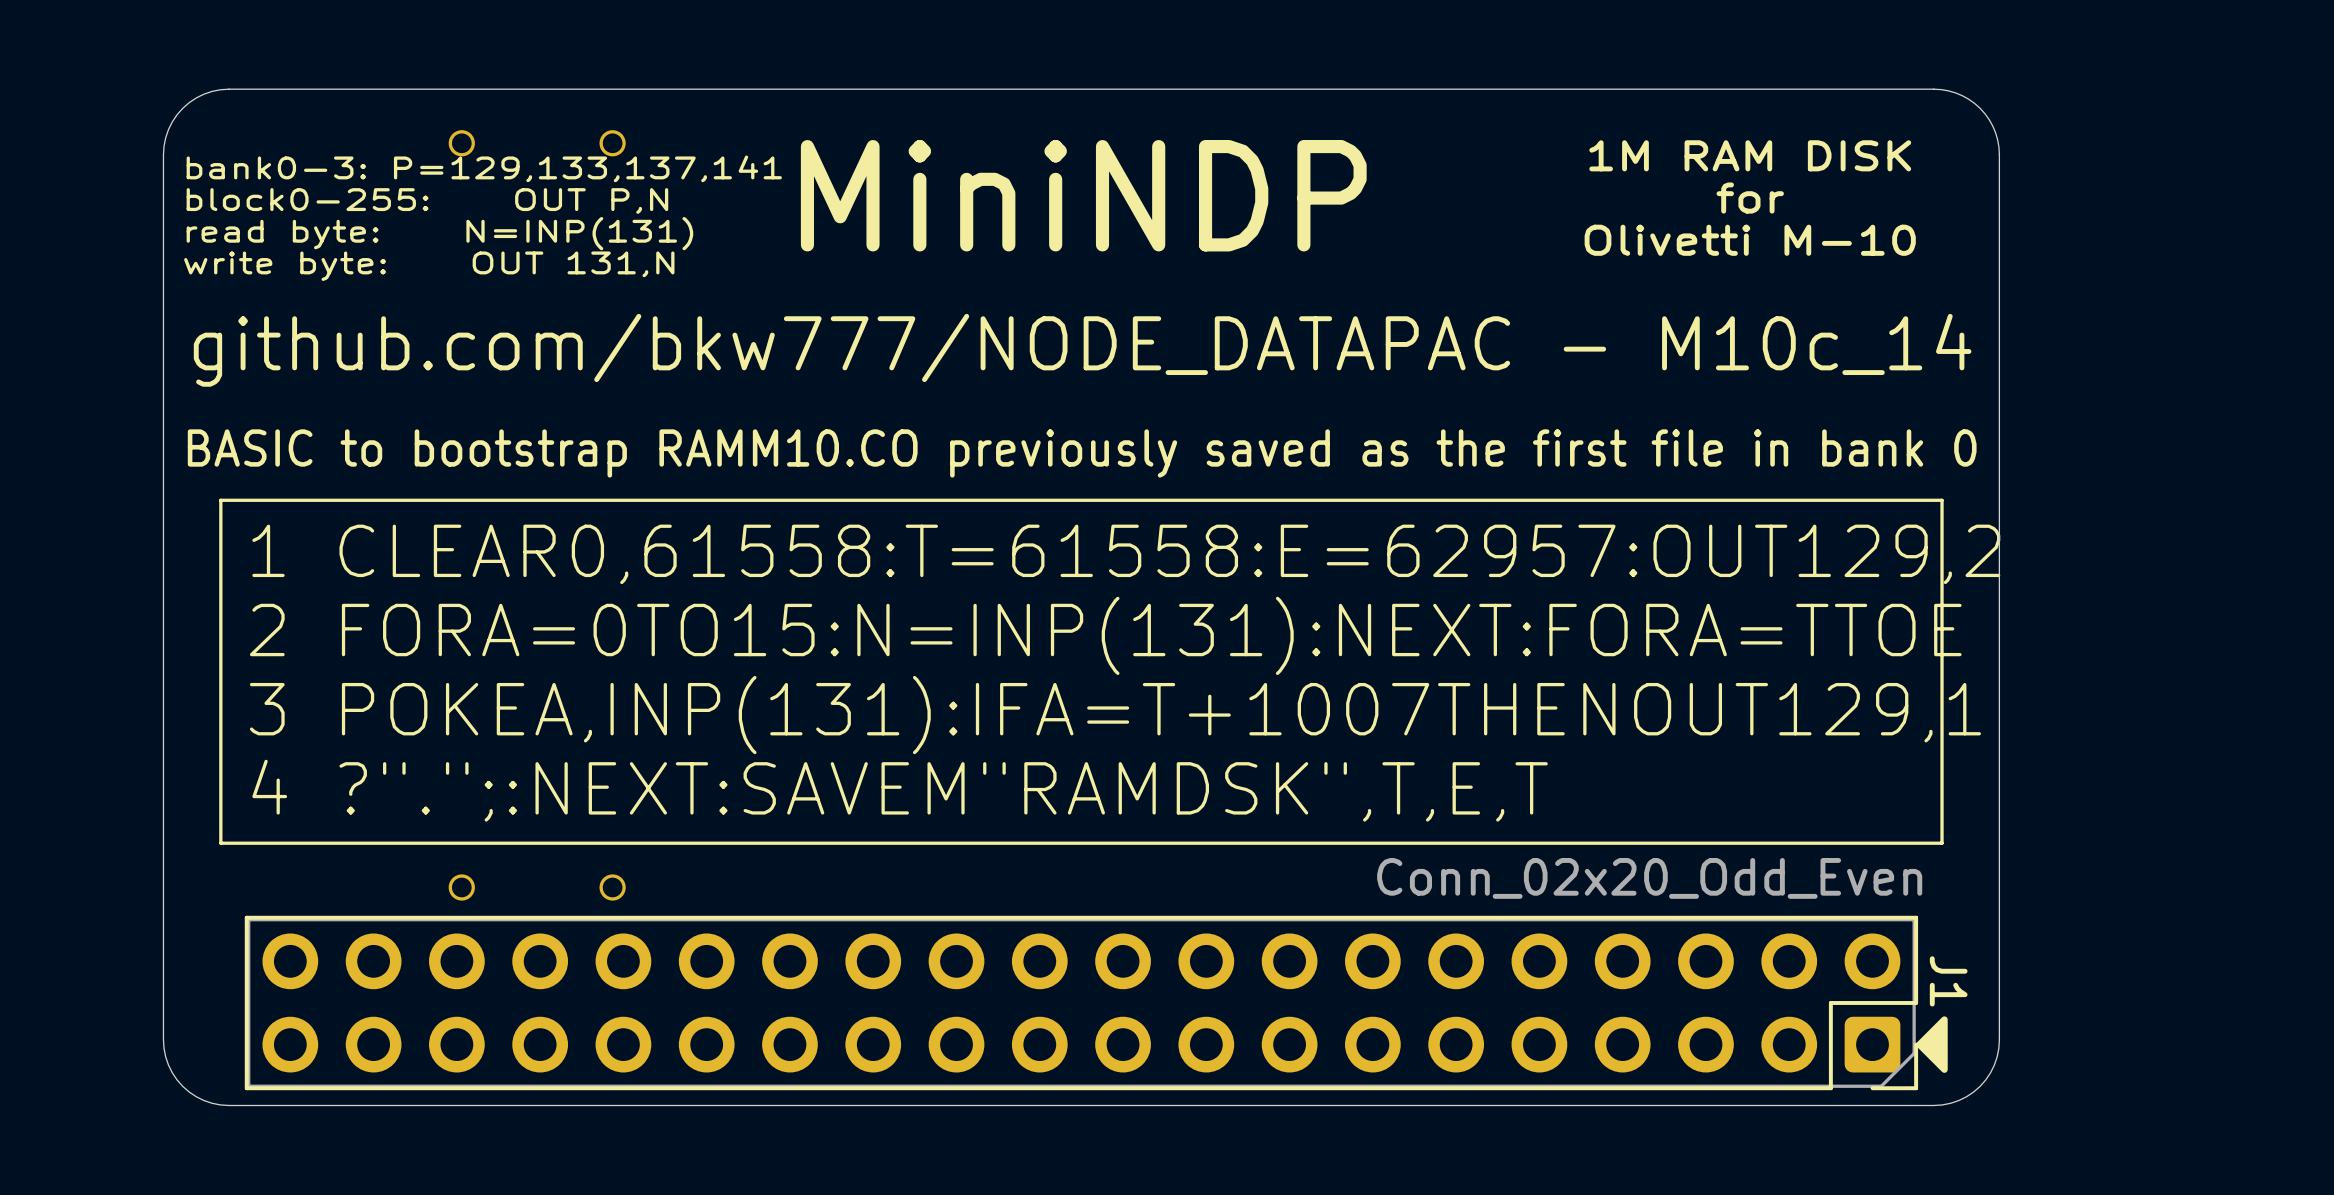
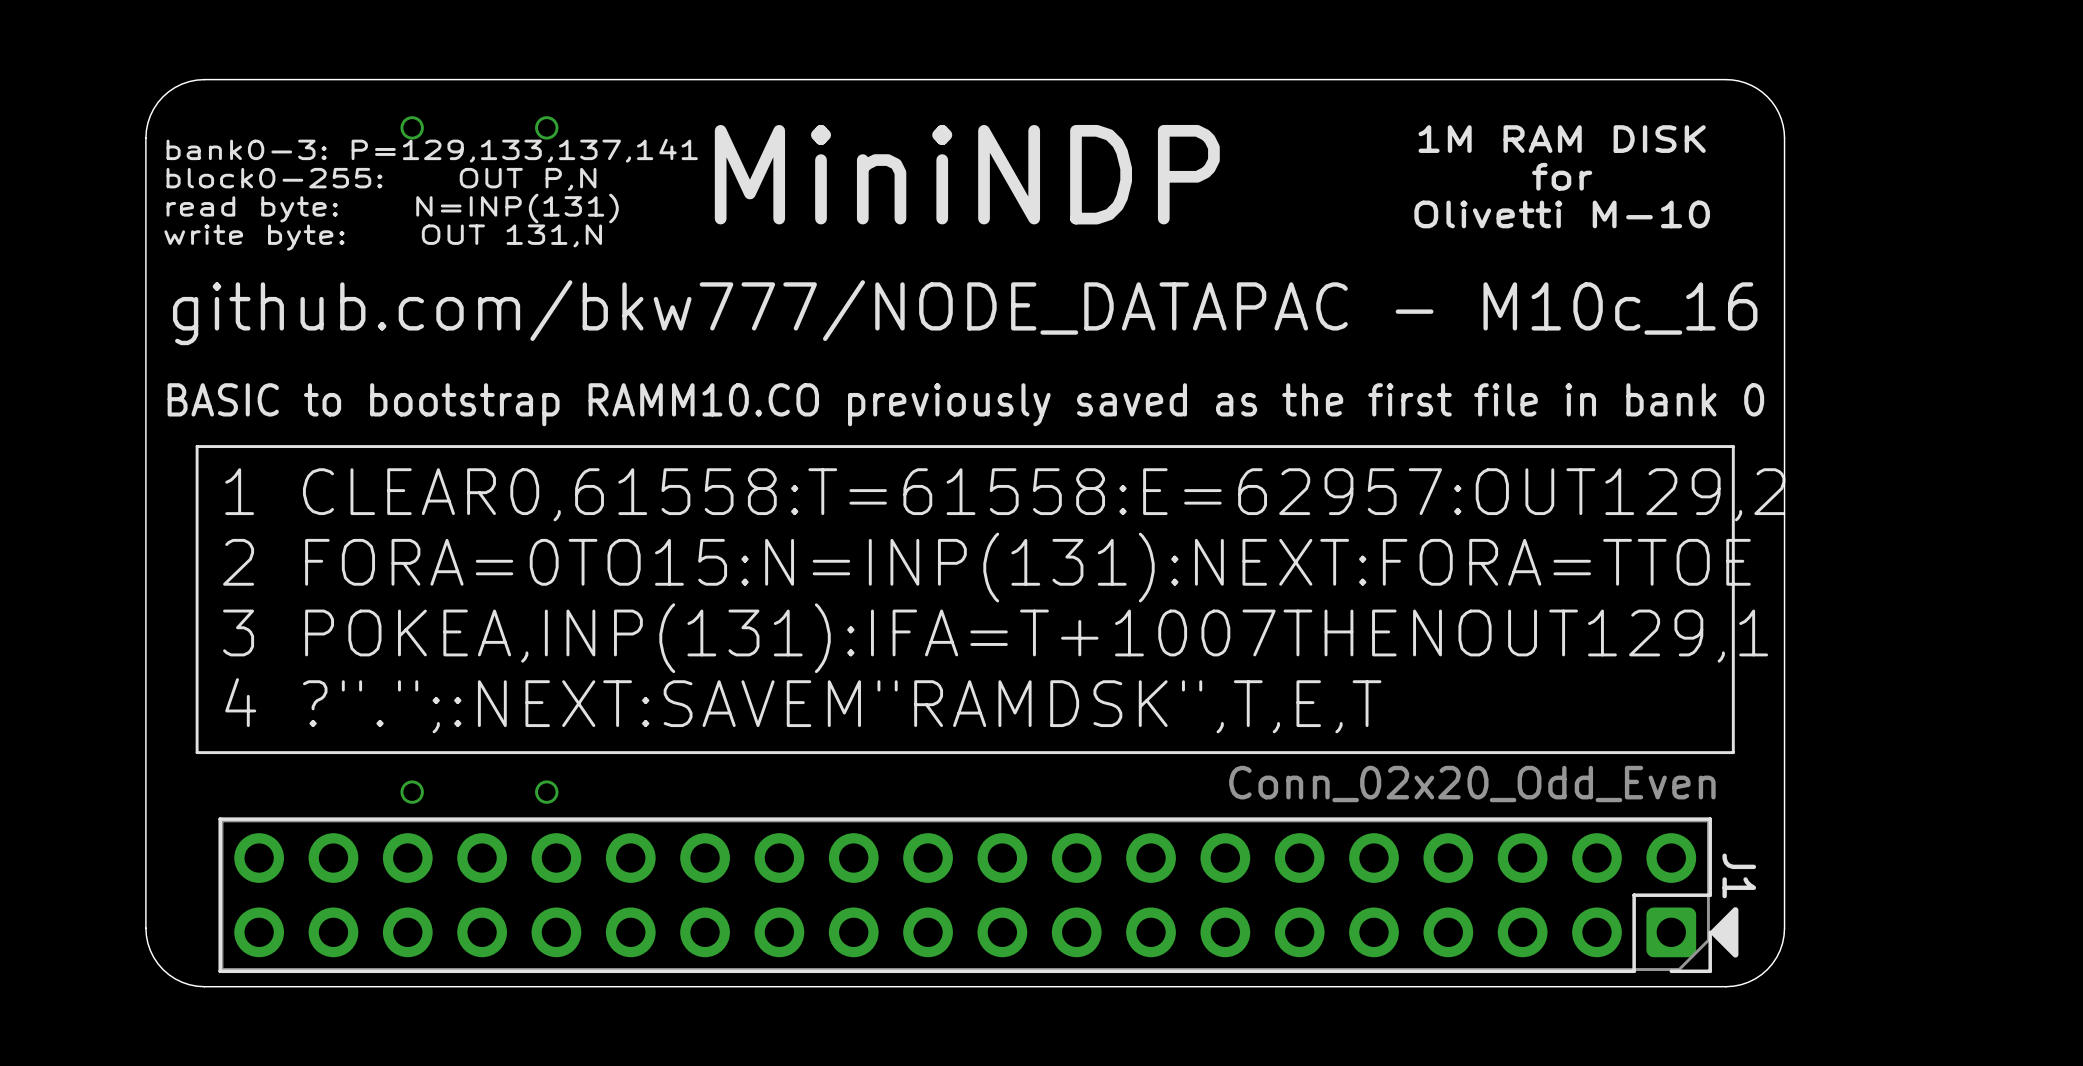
text: github.com/bkw777/NODE_DATAPAC - M10c_14 (1082, 350) -> github.com/bkw777/NODE_DATAPAC - M10c_16 (965, 312)

